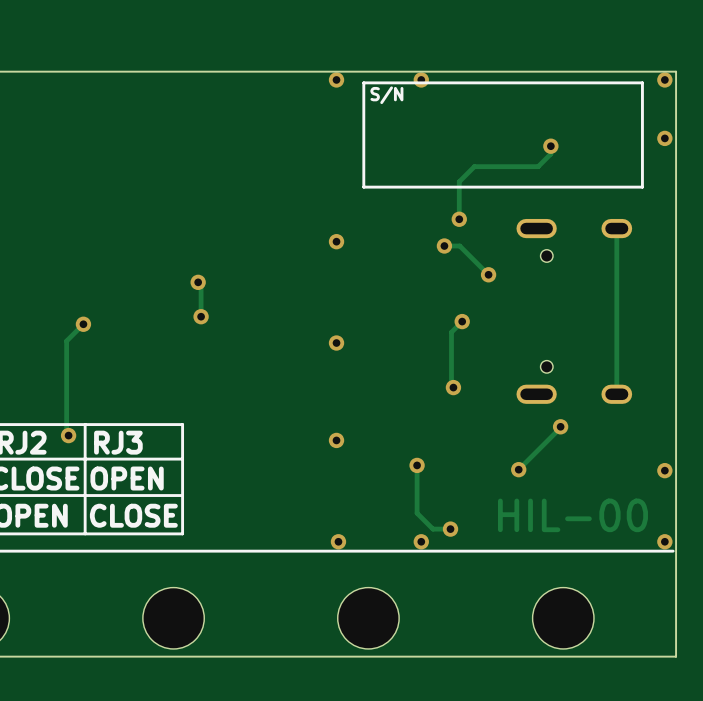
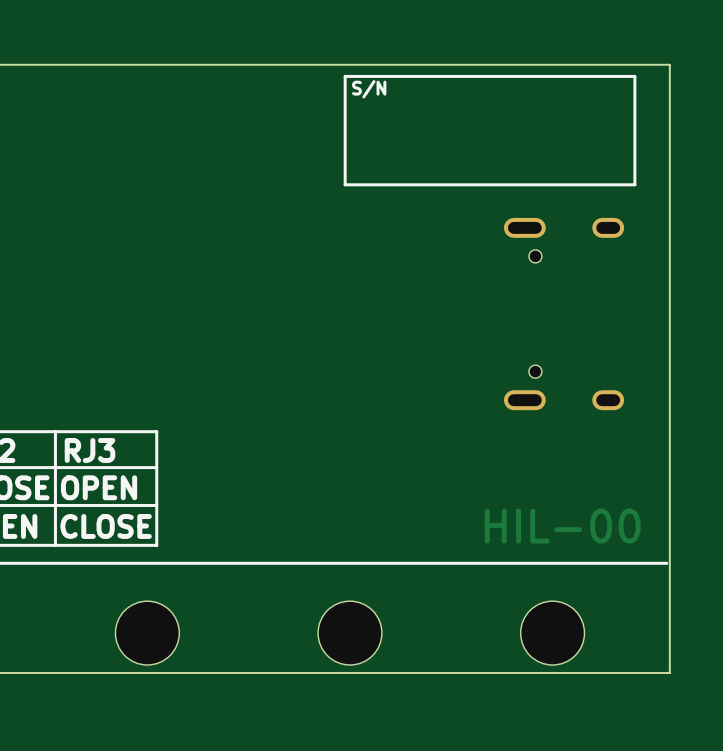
via: (336, 79) -> none
via: (421, 79) -> none
via: (664, 79) -> none
via: (664, 138) -> none
track: (550, 146) (550, 154) (538, 166) (474, 166) (459, 181) (459, 219) -> none
via: (550, 146) -> none
via: (459, 219) -> none
track: (616, 228) (616, 394) -> none
via: (336, 241) -> none
track: (444, 246) (459, 246) (488, 274) -> none
via: (444, 246) -> none
via: (488, 274) -> none
track: (198, 282) (201, 285) (201, 316) -> none
via: (198, 282) -> none
via: (201, 316) -> none
track: (462, 321) (451, 332) (451, 385) (453, 387) -> none
via: (462, 321) -> none
track: (83, 324) (66, 341) (66, 433) (68, 435) -> none
via: (83, 324) -> none
via: (336, 343) -> none
via: (453, 387) -> none
track: (560, 426) (518, 469) -> none
via: (560, 426) -> none
via: (68, 435) -> none
via: (336, 440) -> none
track: (417, 465) (417, 513) (432, 529) (450, 529) -> none
via: (417, 465) -> none
via: (518, 469) -> none
via: (664, 470) -> none
via: (450, 529) -> none
via: (338, 541) -> none
via: (421, 541) -> none
via: (664, 541) -> none

